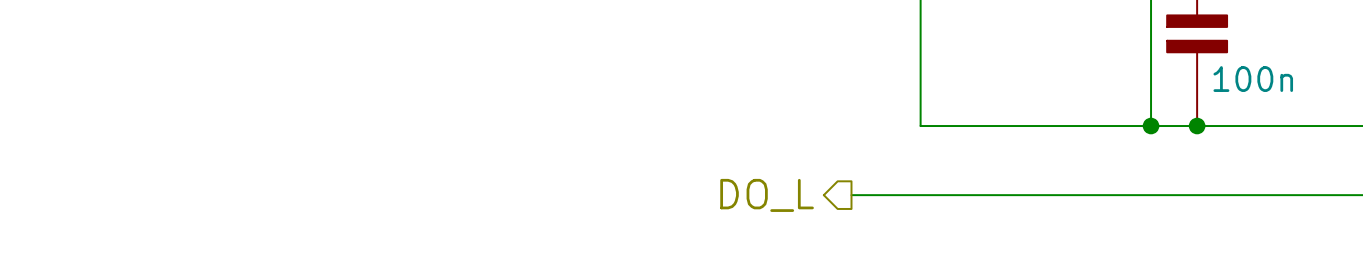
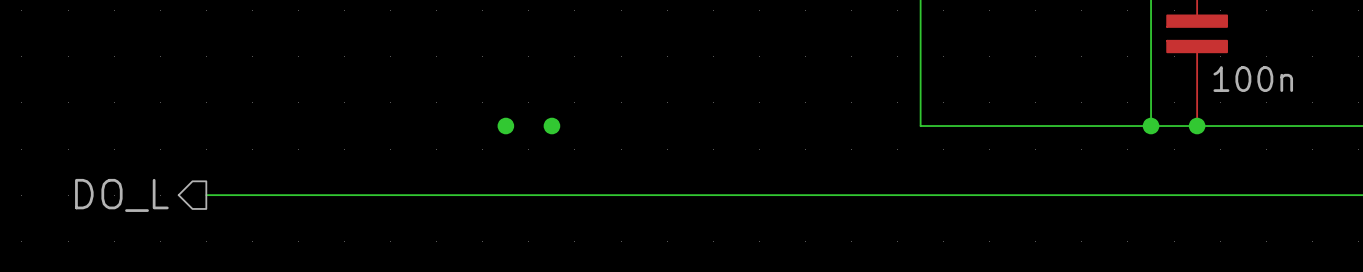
junction: none -> (505, 126)
junction: none -> (551, 126)
hierarchical label: none -> DO_L (121, 195)
wire: none -> (206, 195) (851, 195)
hierarchical label: DO_L (767, 195) -> none

